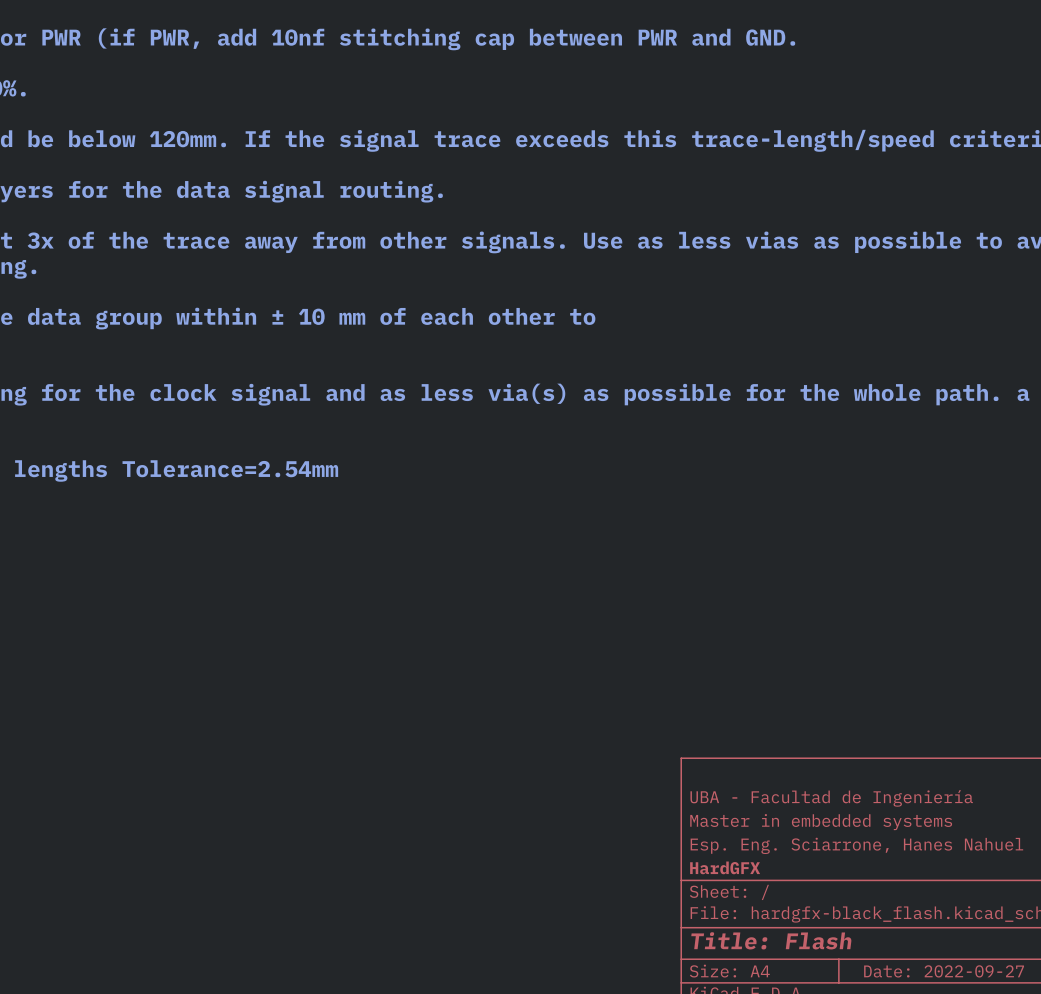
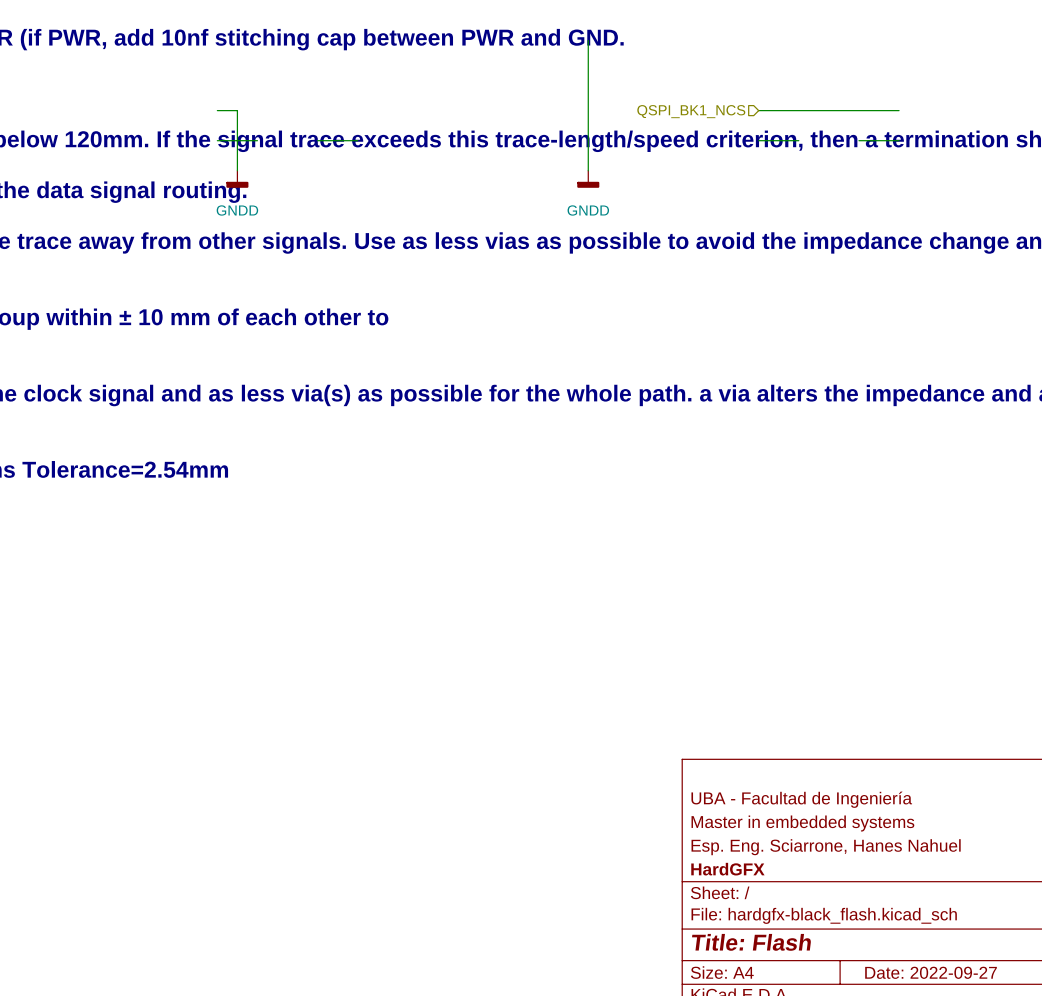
wire: none -> (588, 40) (588, 170)
wire: none -> (217, 110) (237, 110) (237, 170)
wire: none -> (758, 110) (899, 110)
hierarchical label: none -> QSPI_BK1_NCS (691, 111)
wire: none -> (217, 140) (257, 140)
wire: none -> (317, 140) (357, 140)
wire: none -> (758, 140) (798, 140)
wire: none -> (858, 140) (899, 140)
power symbol: none -> GNDD (237, 179)
power symbol: none -> GNDD (588, 179)

